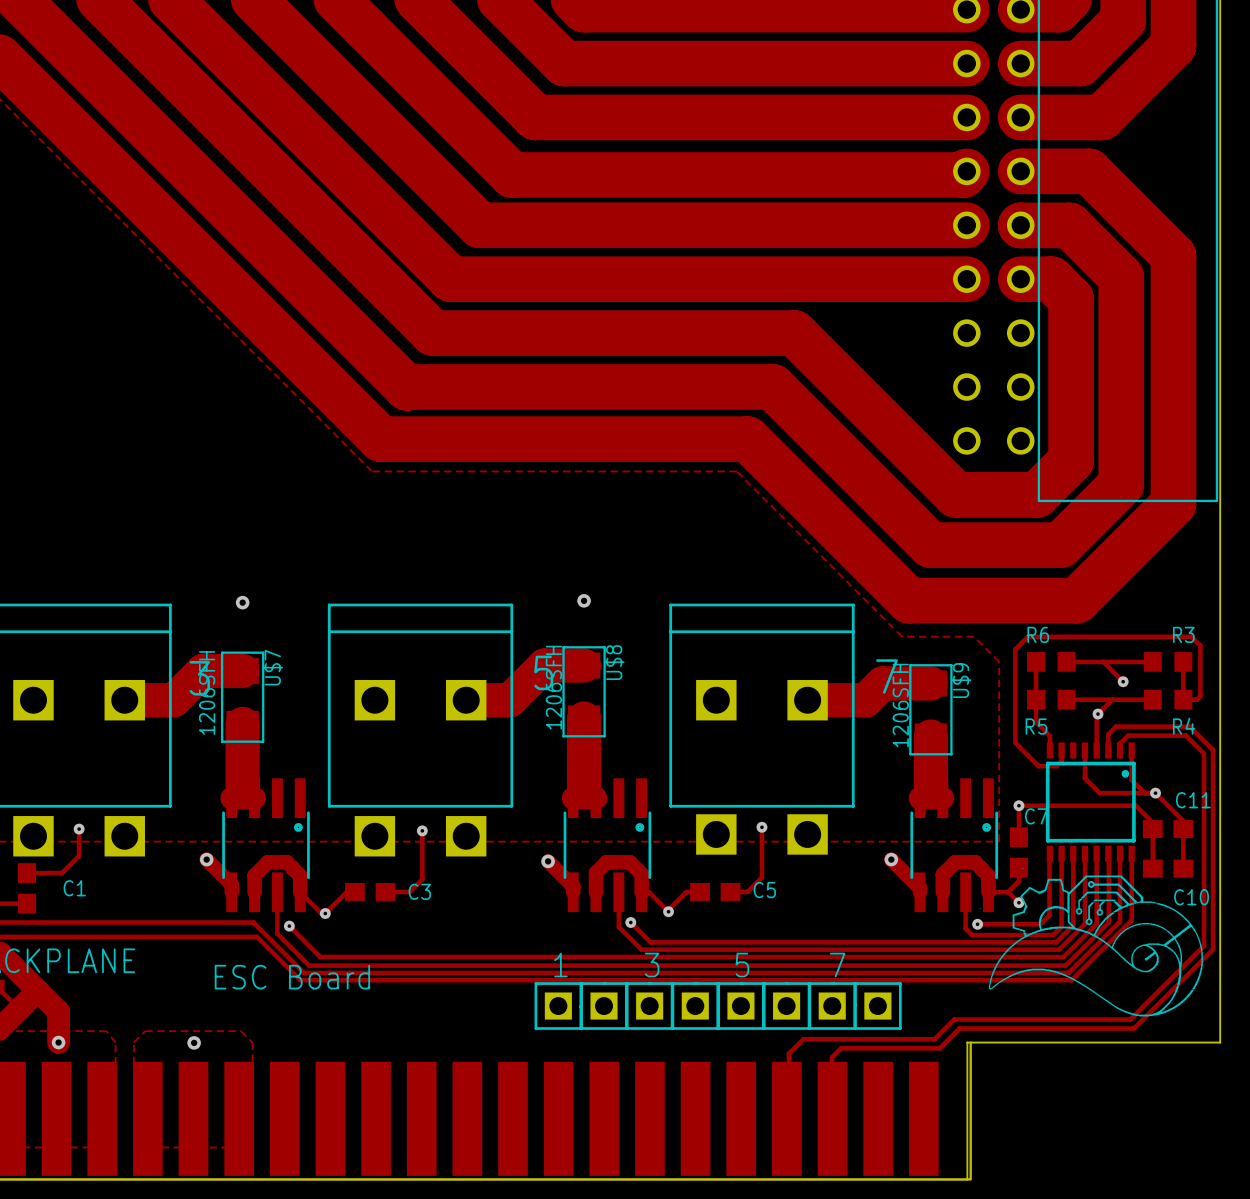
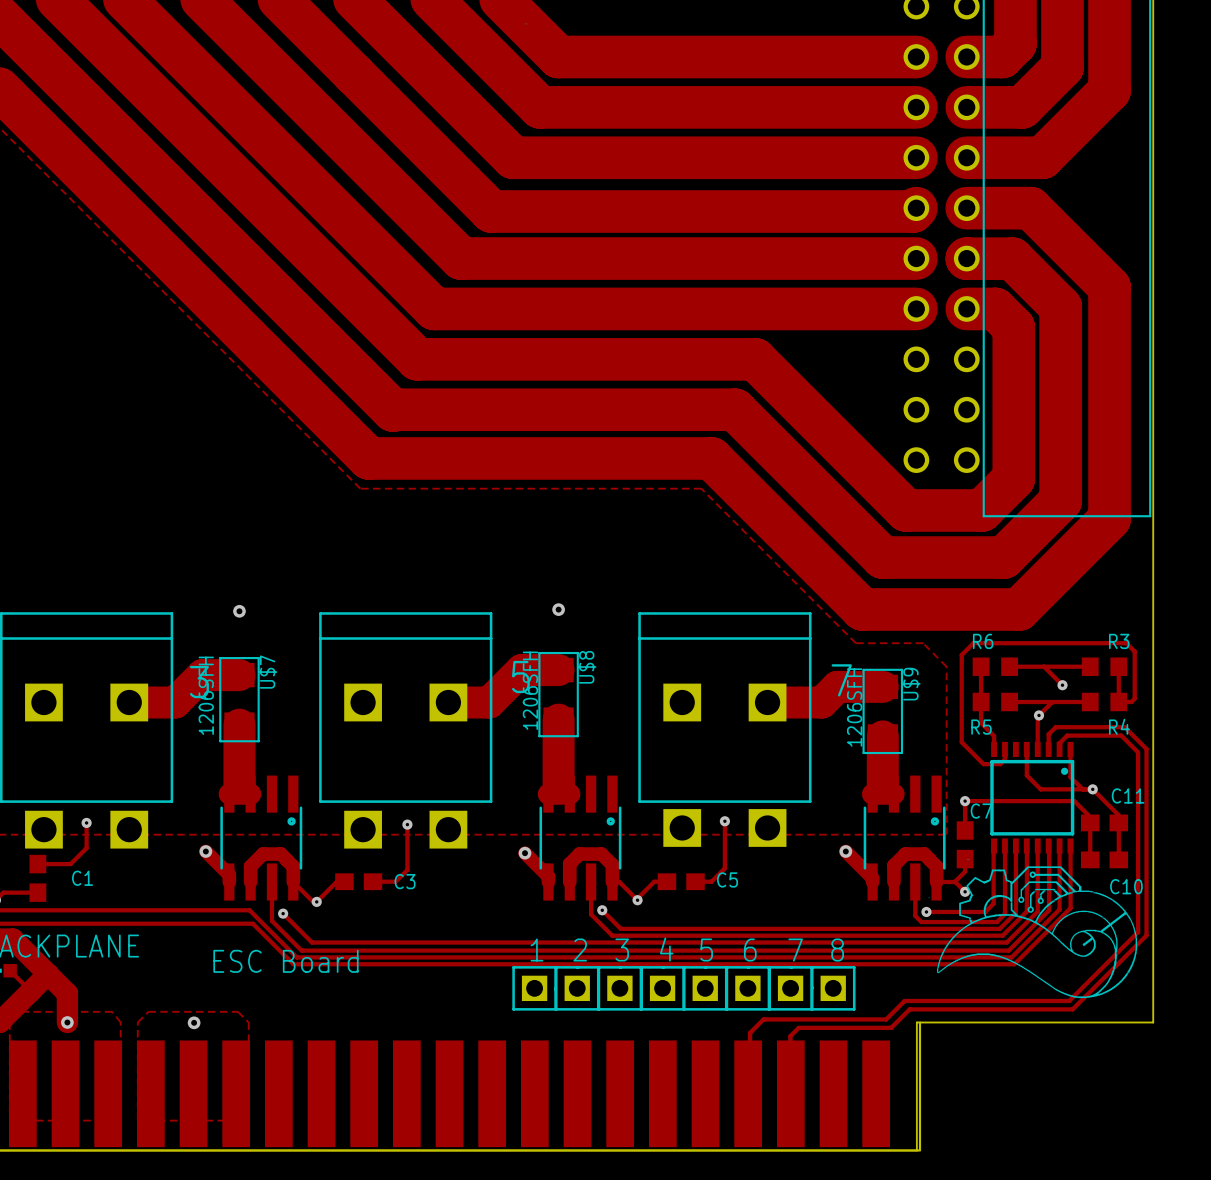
text: none -> 4 (666, 949)
text: none -> 2 (580, 950)
text: none -> 6 (750, 950)
text: none -> 8 (837, 950)

